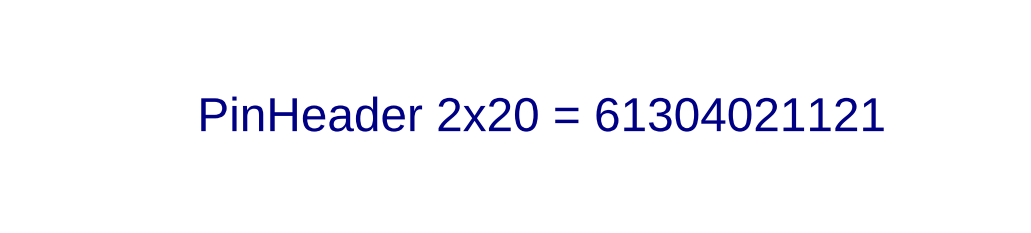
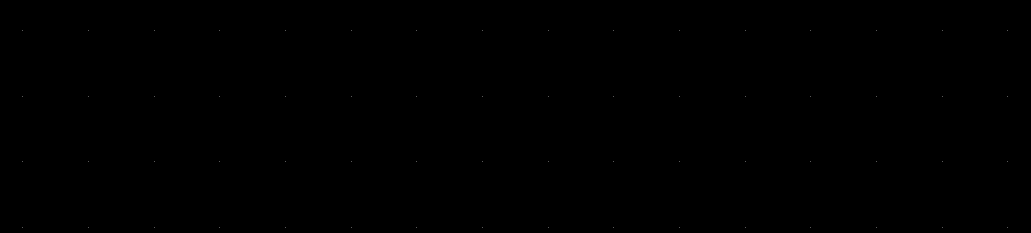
text: PinHeader 2x20 = 61304021121 (542, 114) -> none

